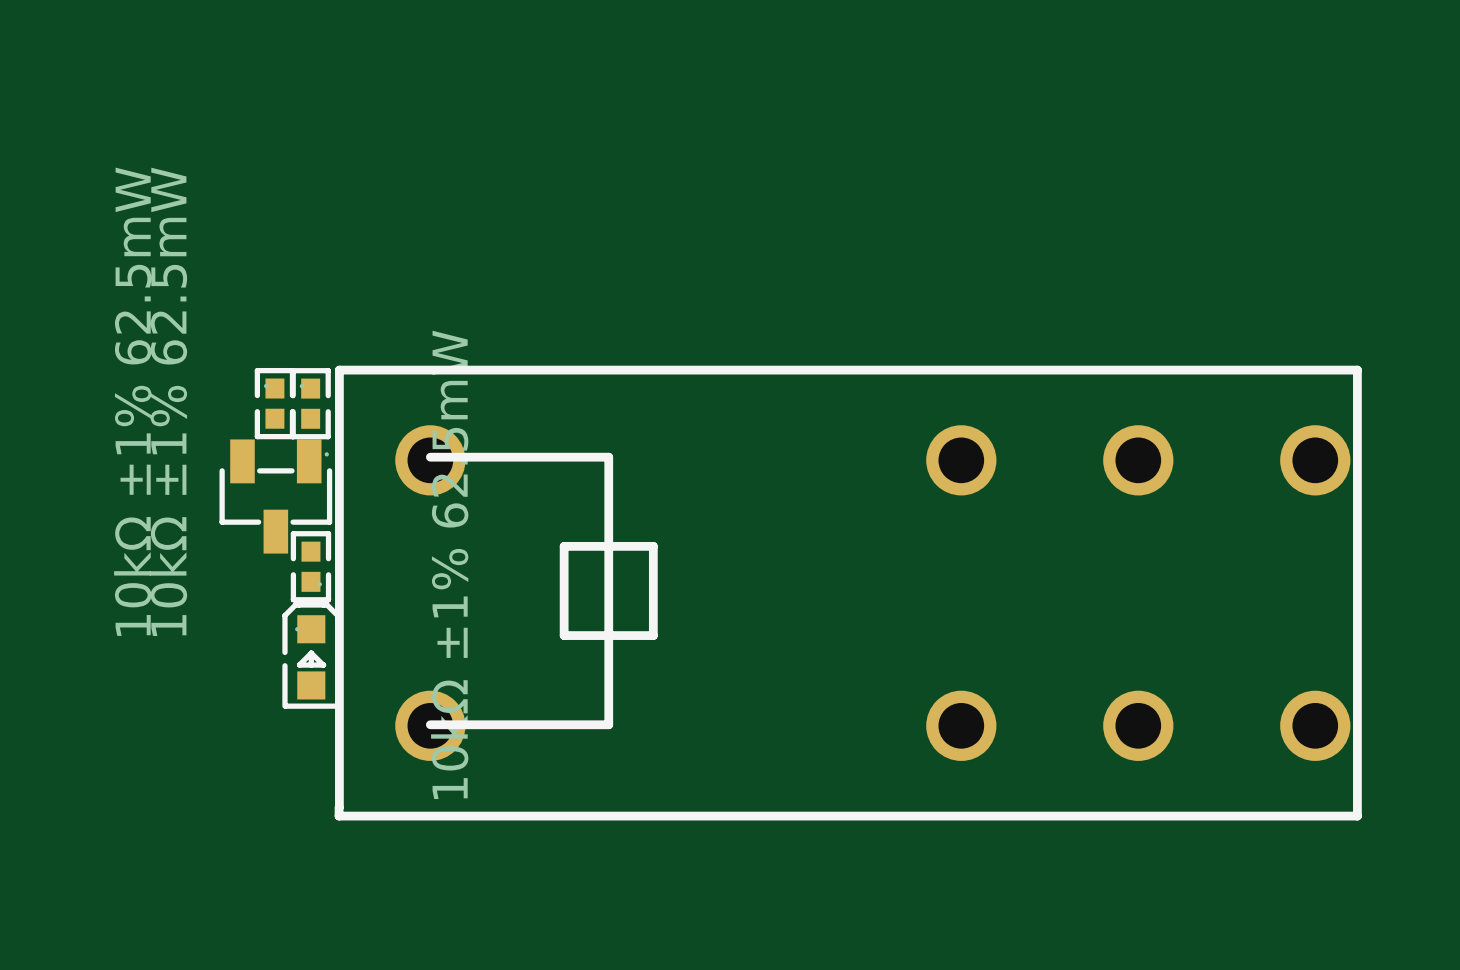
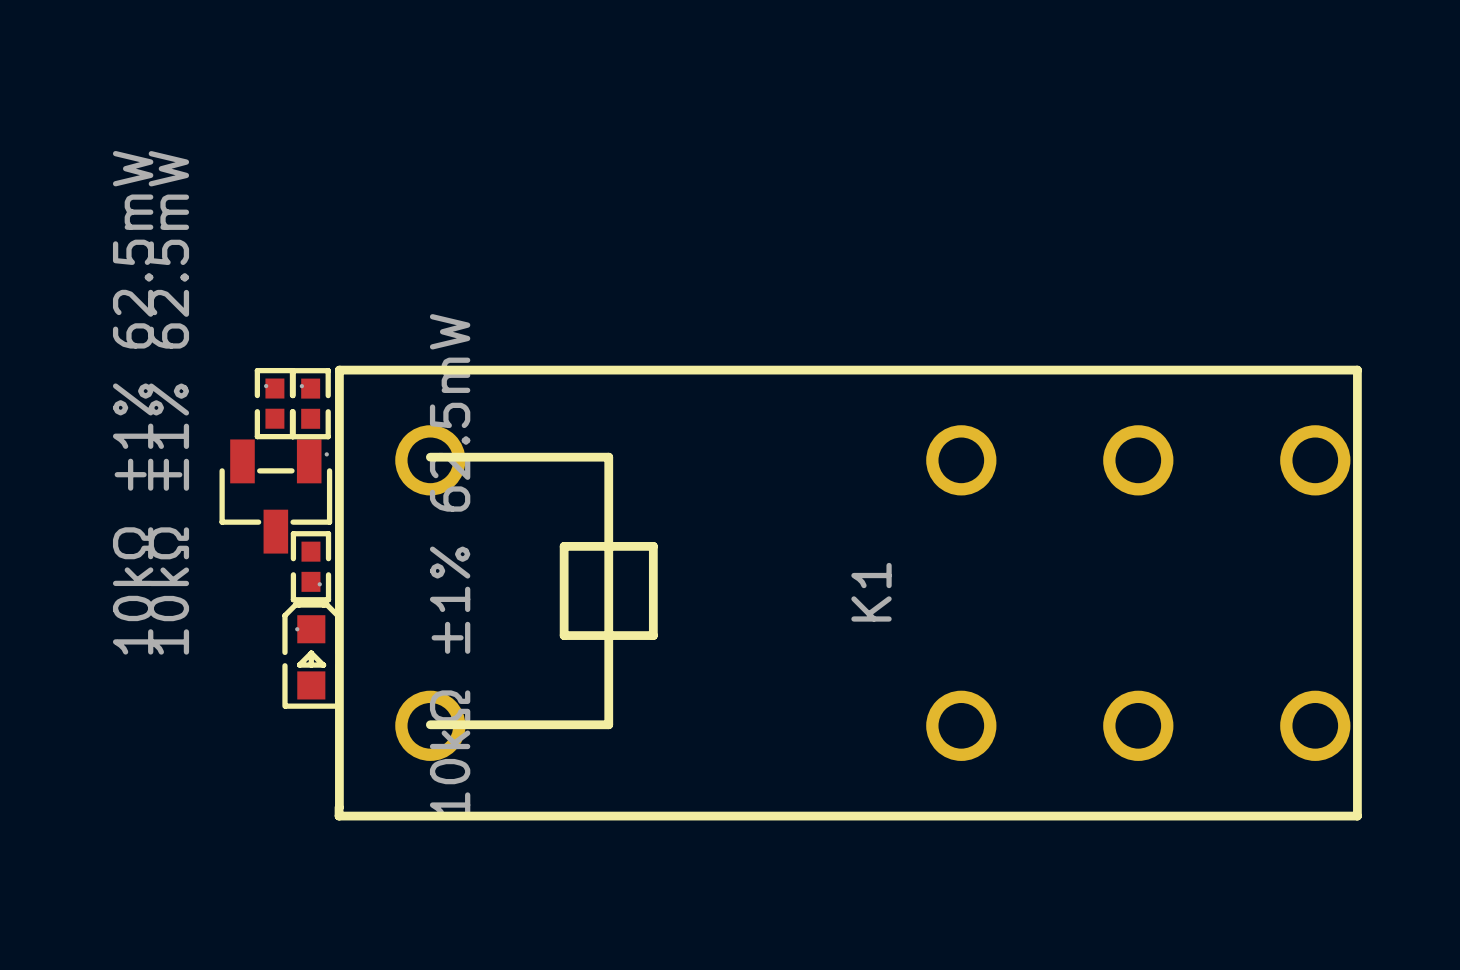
K1 name: none -> K1 (871, 592)

